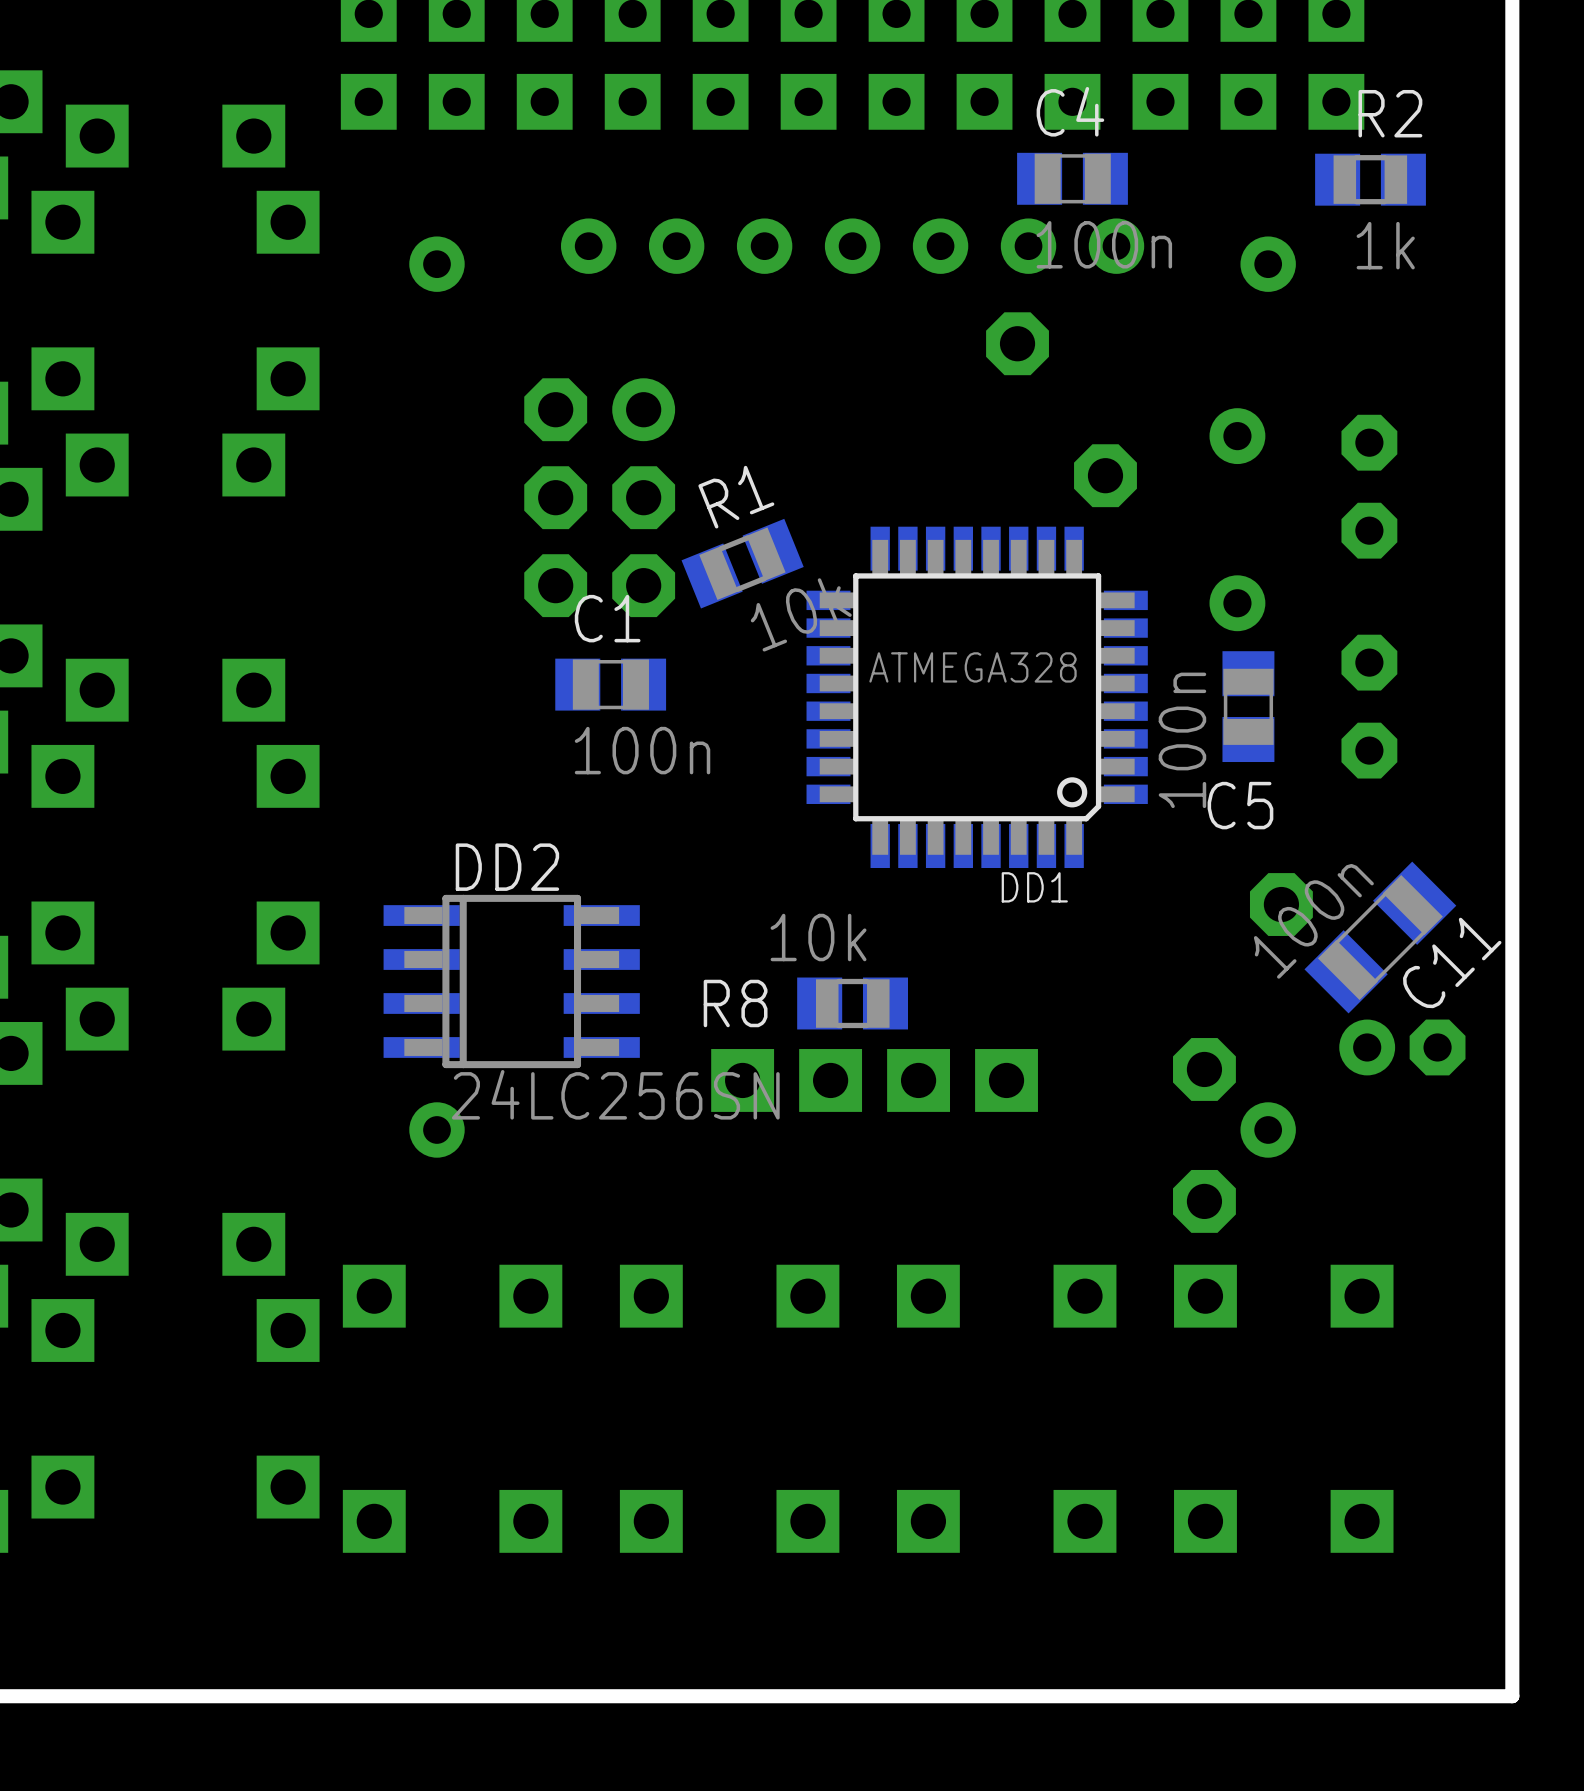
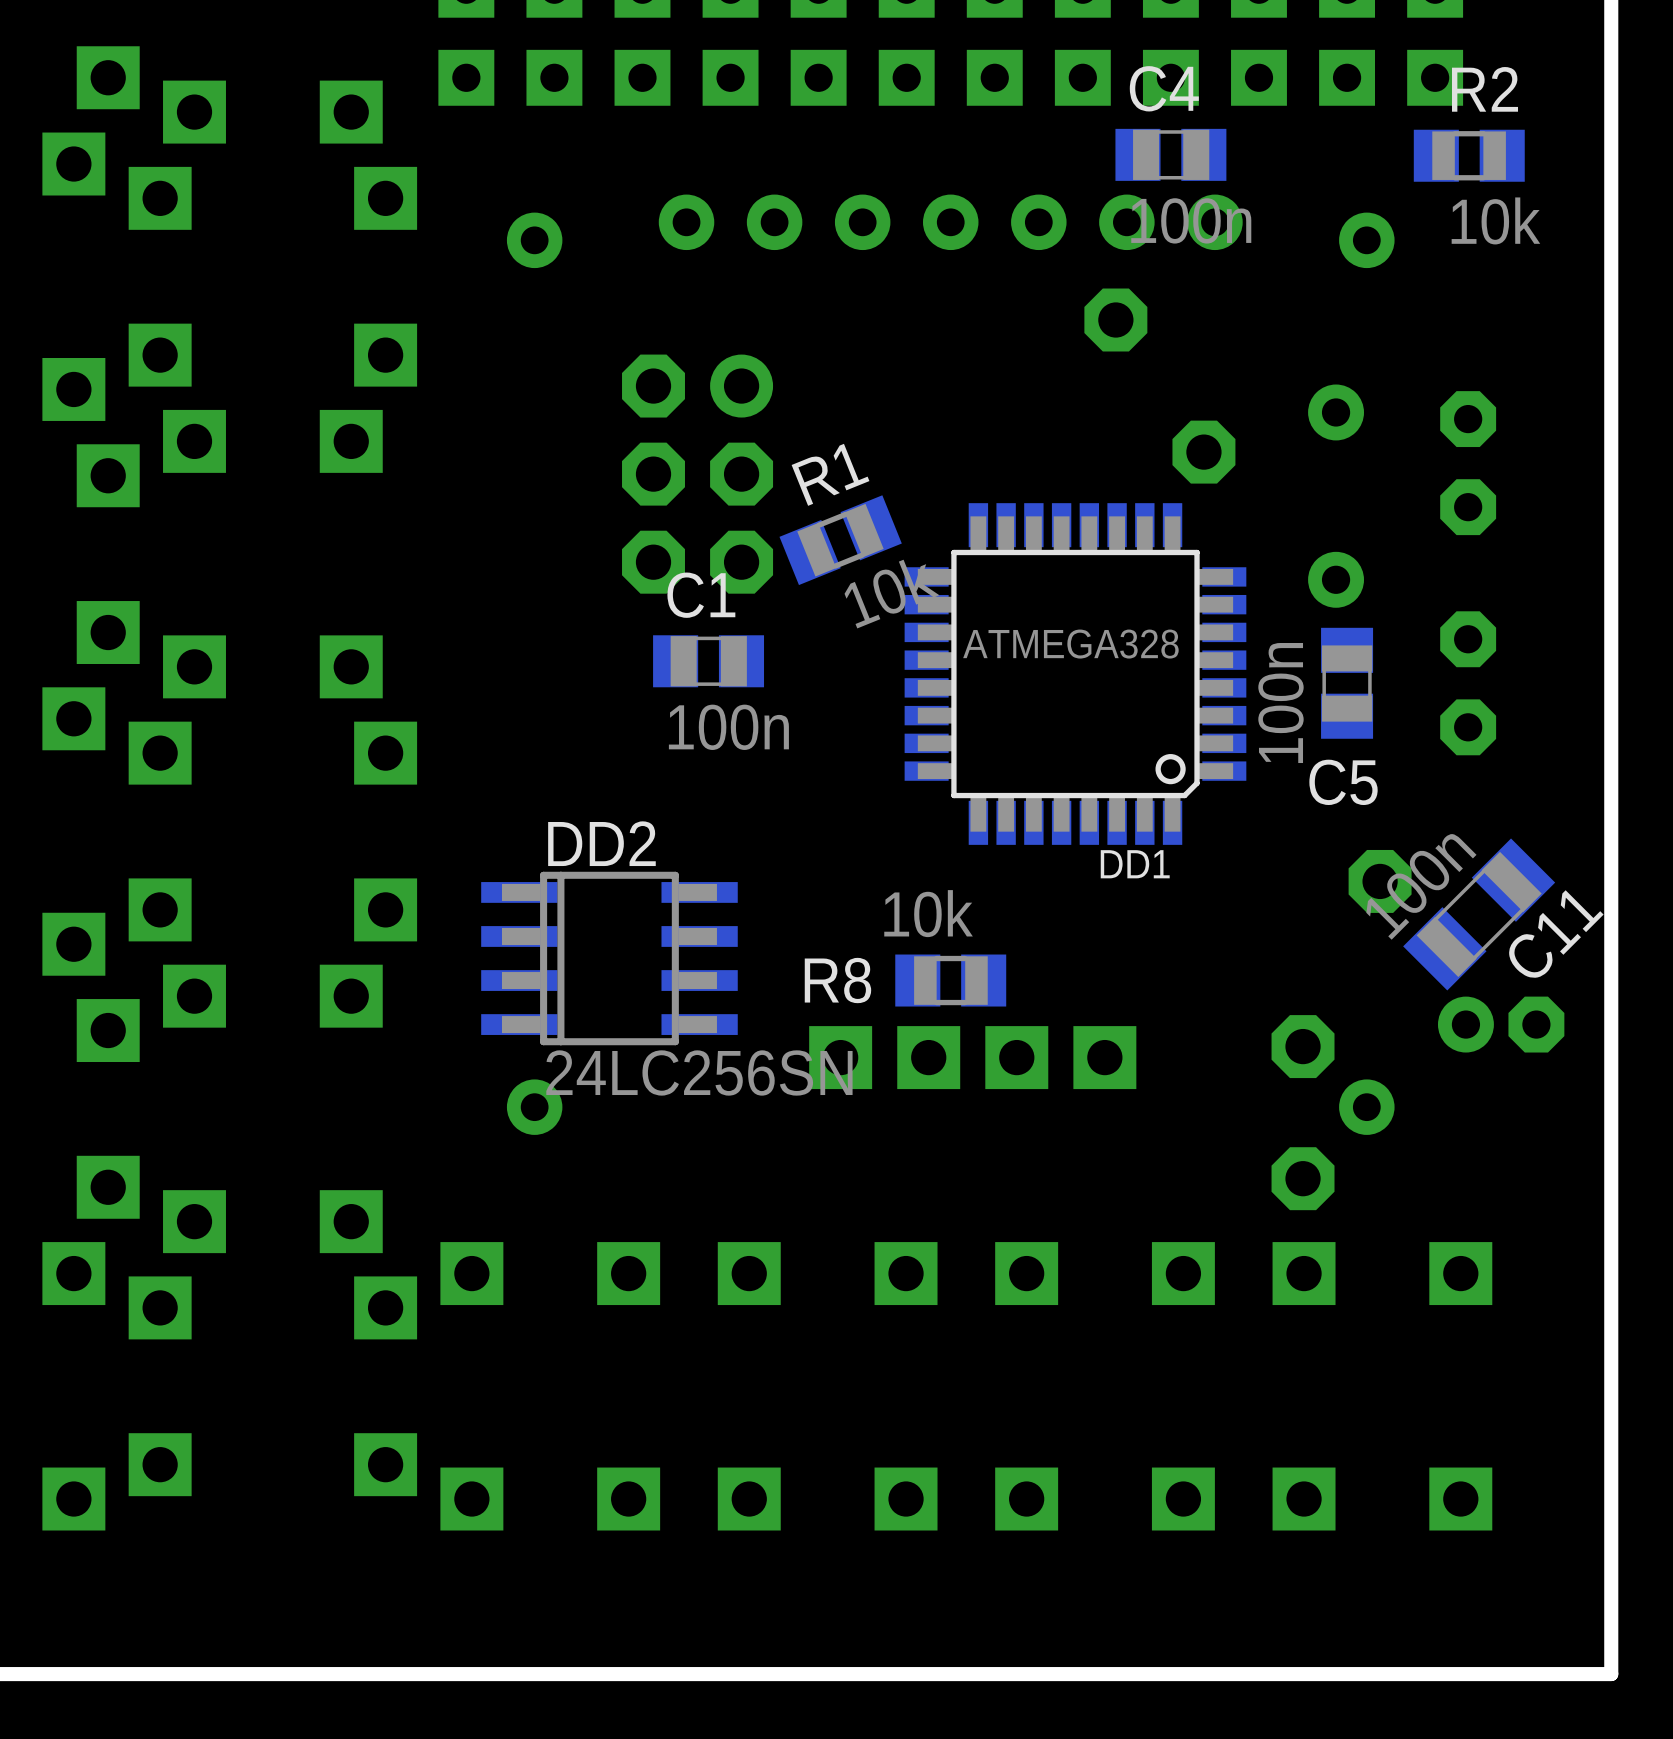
R2 value: 1k (1385, 245) -> 10k (1495, 220)

